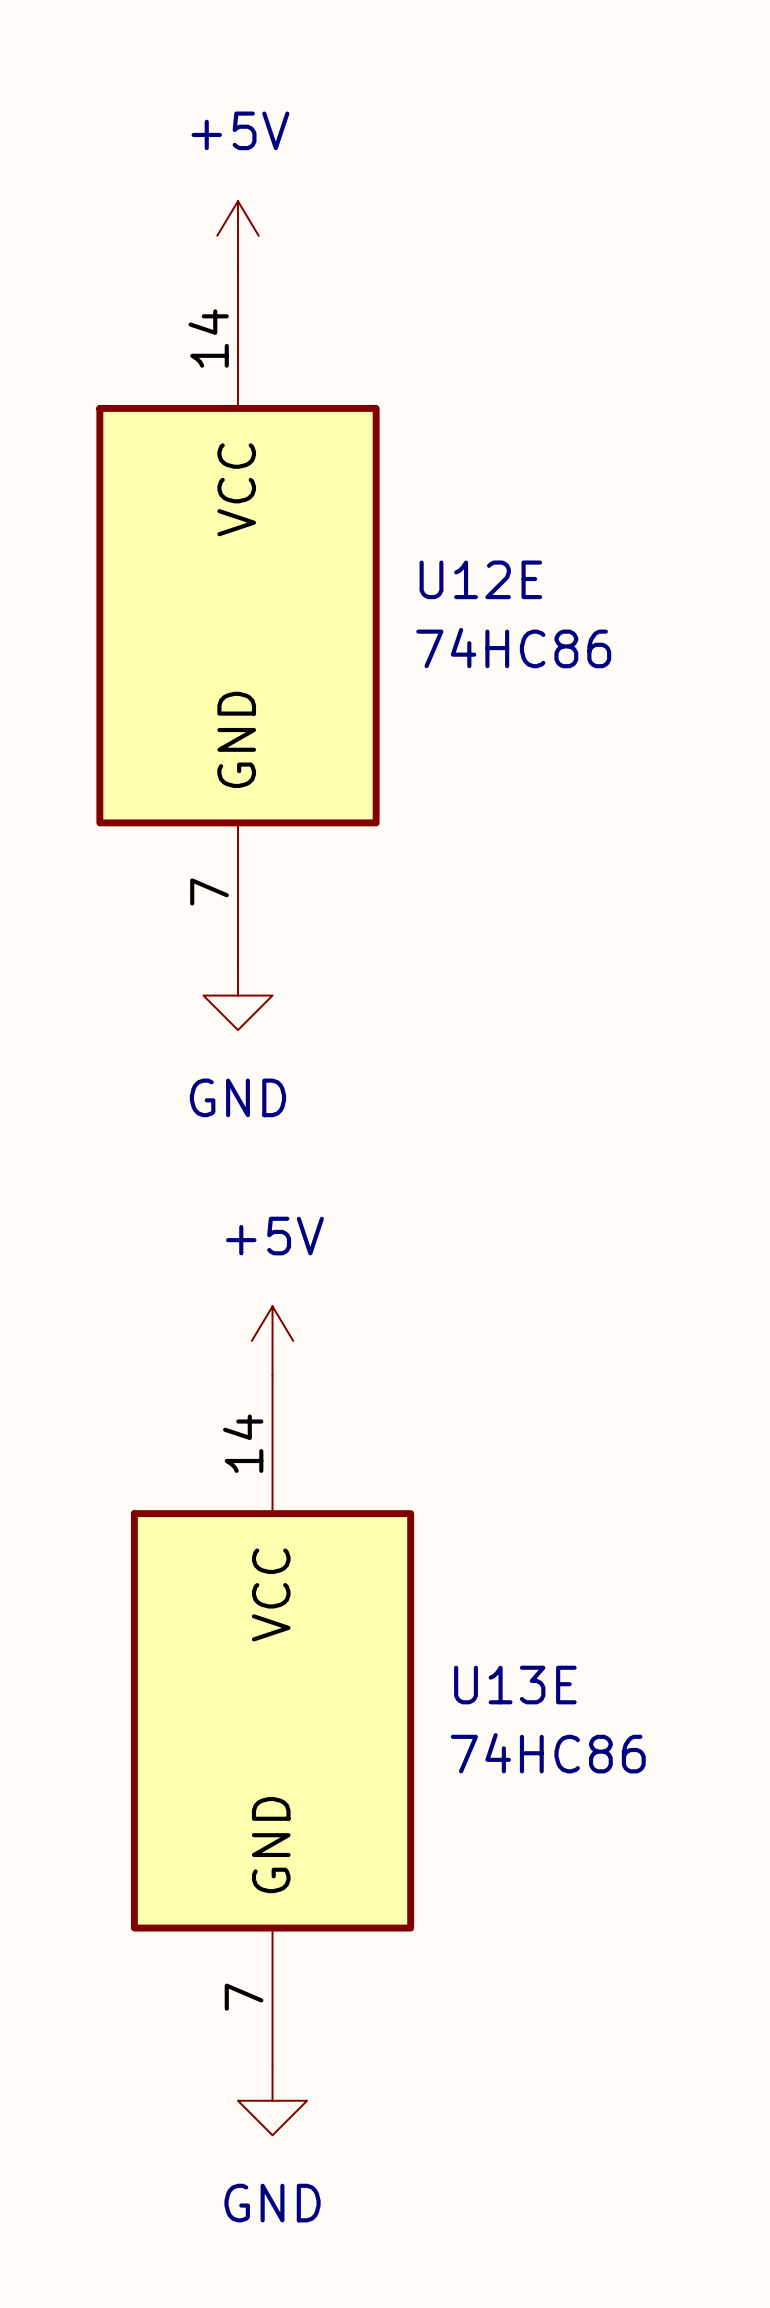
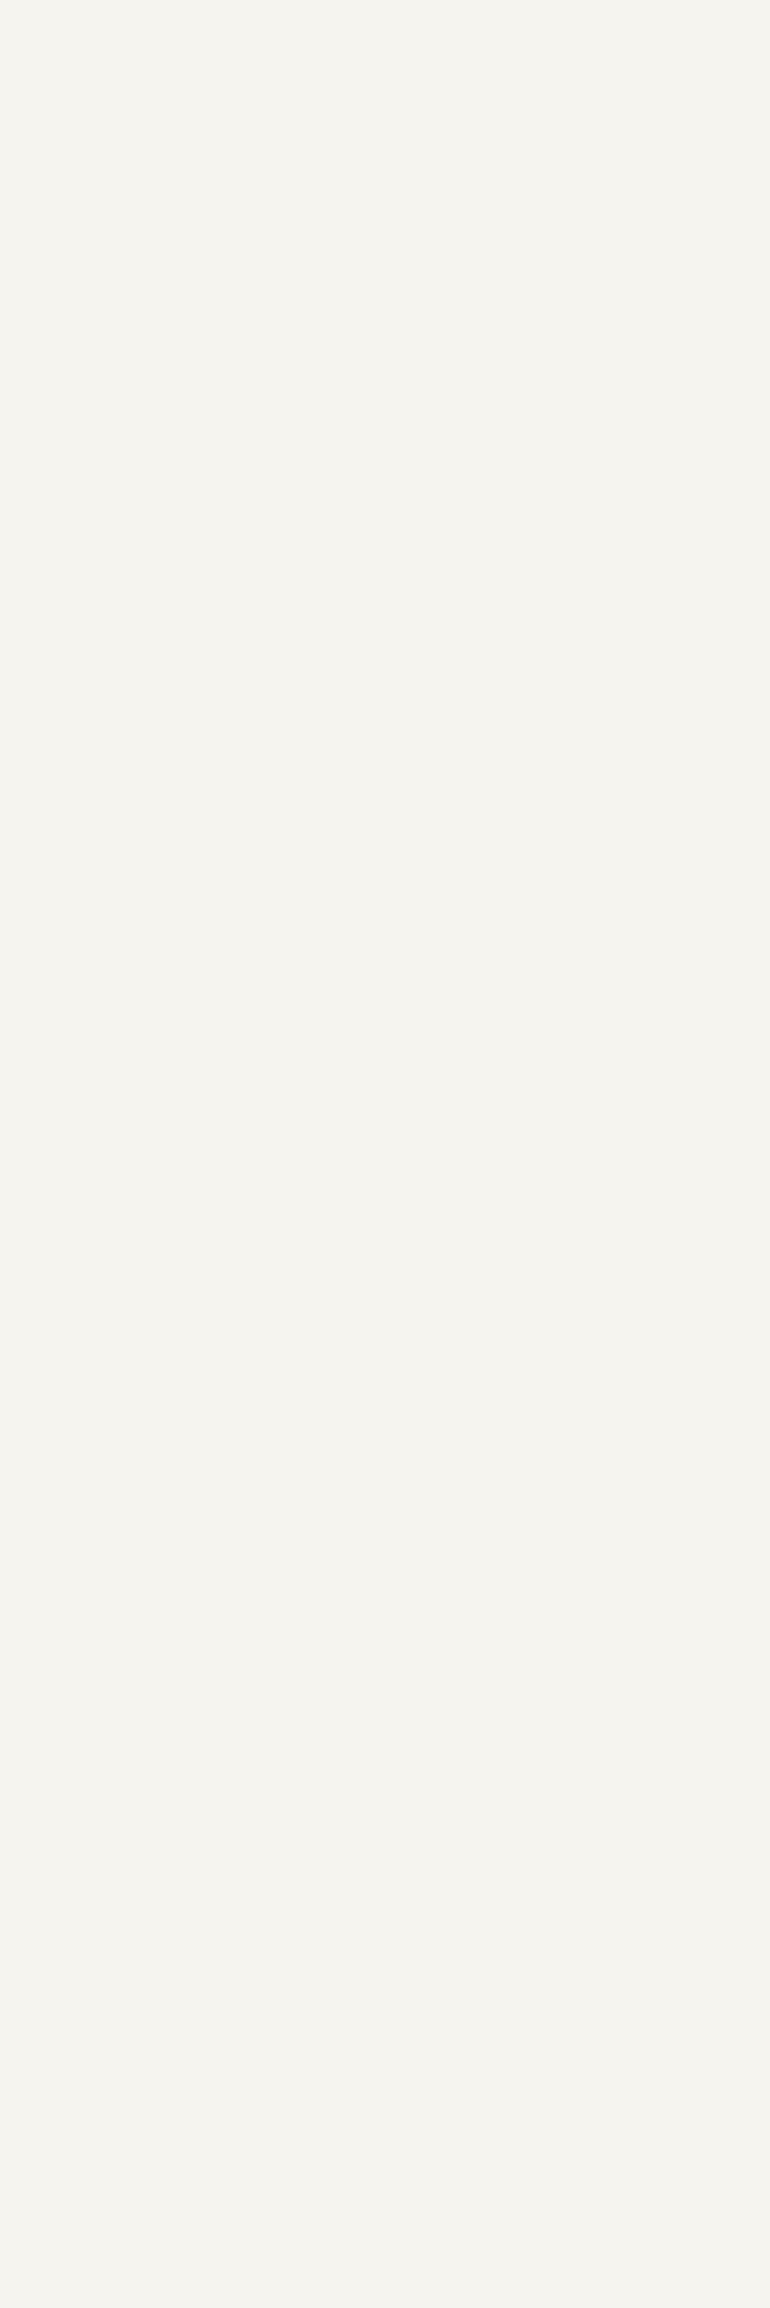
power symbol: +5V (237, 235) -> none
U12E: 74HC86 (237, 615) -> none
power symbol: GND (237, 995) -> none
power symbol: +5V (272, 1340) -> none
U13E: 74HC86 (272, 1720) -> none
power symbol: GND (272, 2100) -> none

